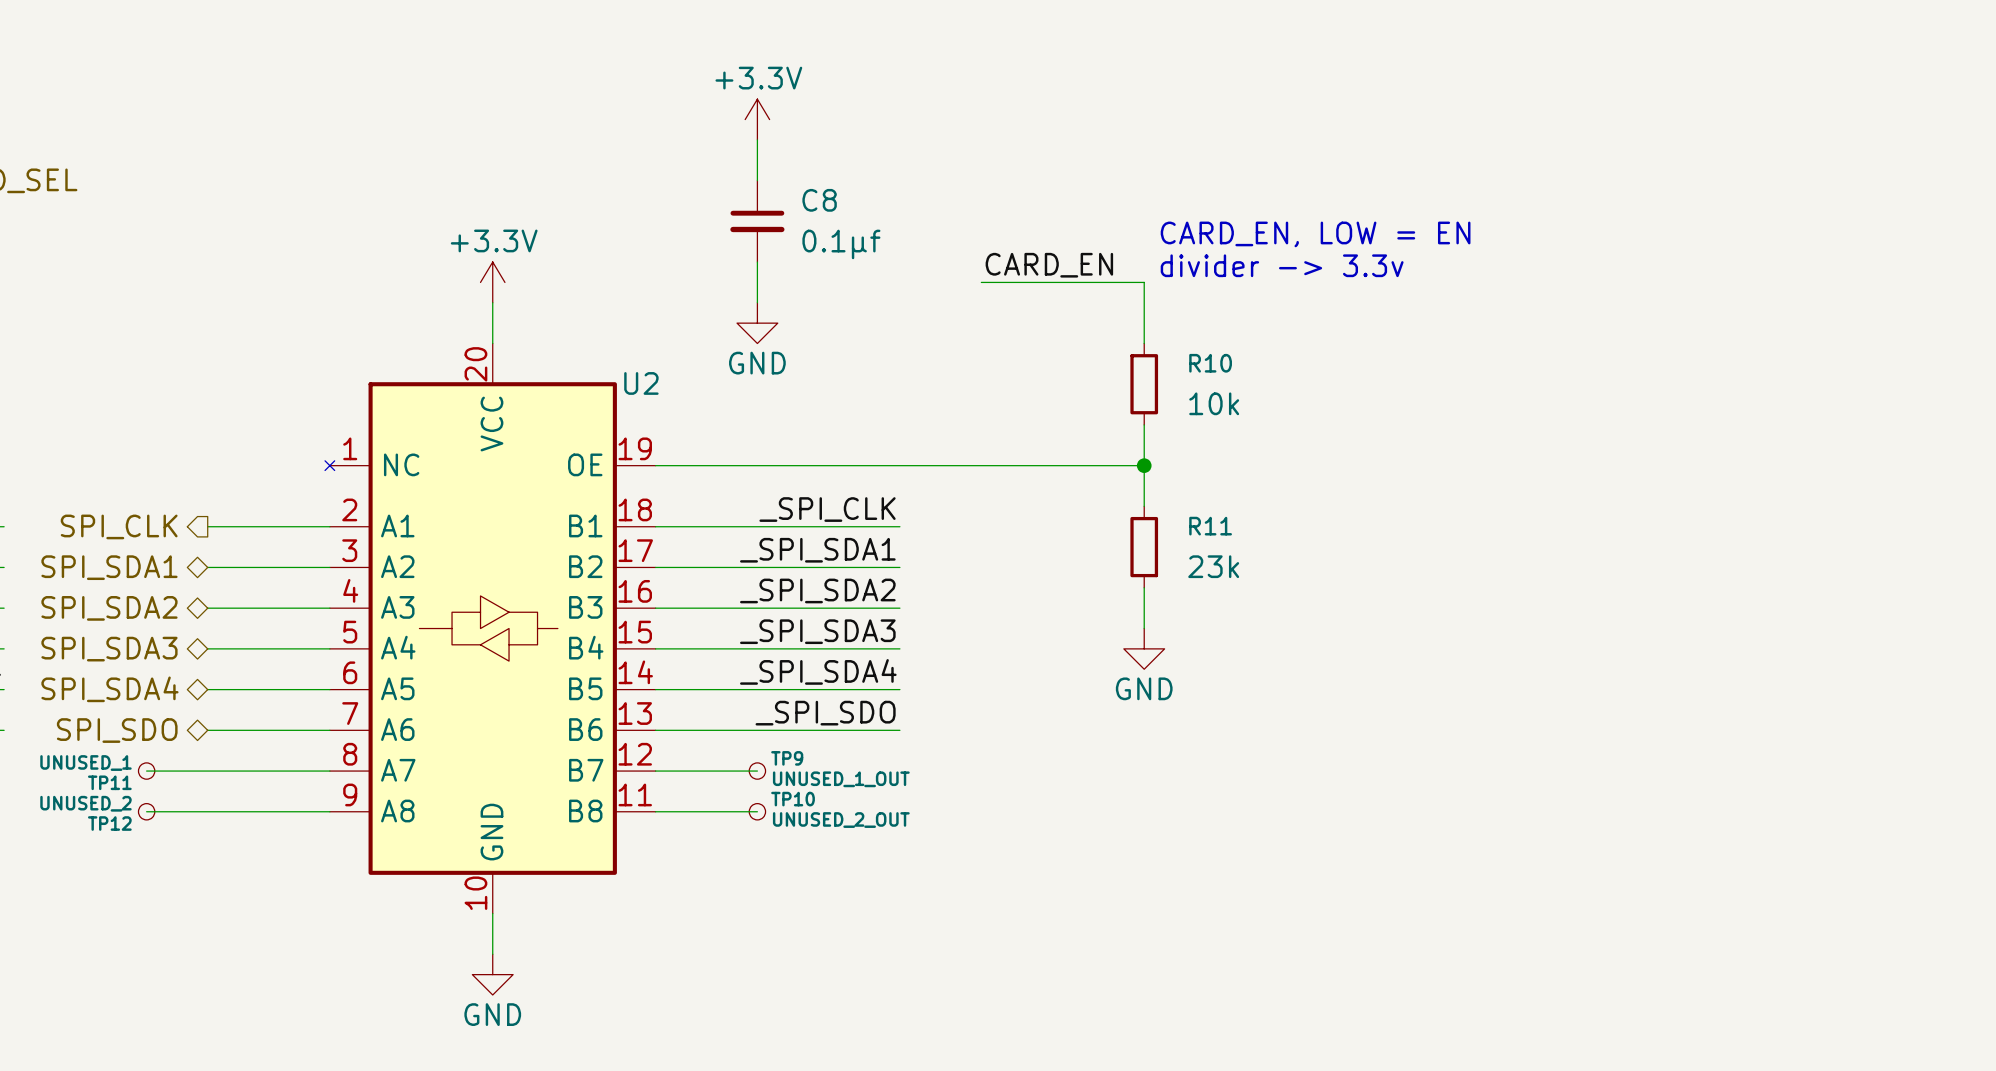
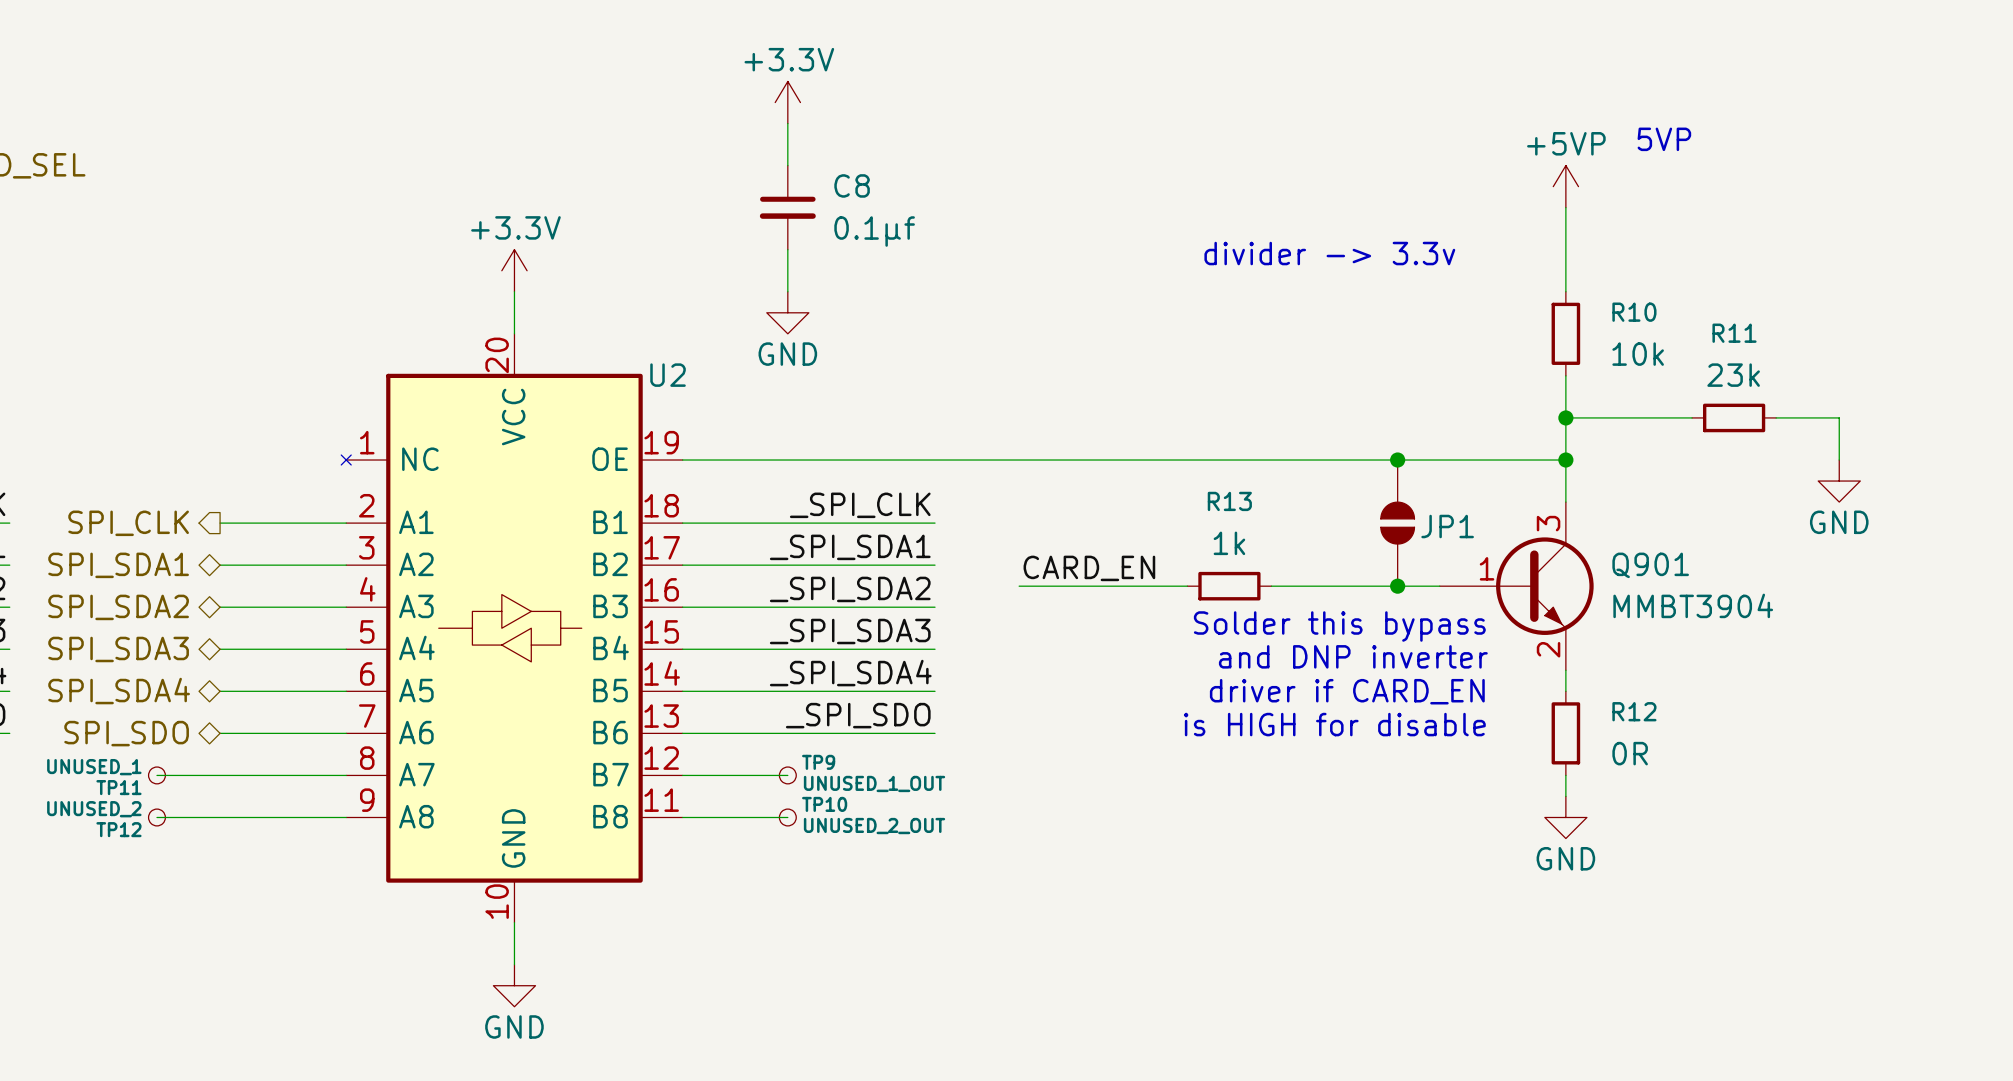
text: none -> 5VP (1664, 139)
power symbol: none -> +5VP (1565, 186)
wire: none -> (1565, 207) (1565, 291)
text: CARD_EN, LOW = EN (1315, 234) -> none
label position: CARD_EN (1049, 265) -> CARD_EN (1089, 568)
wire: (981, 282) (1144, 282) (1144, 343) -> none
R10 position: (1144, 384) -> (1565, 333)
wire: none -> (1565, 375) (1565, 502)
wire: (1144, 424) (1144, 506) -> none
wire: none -> (1565, 417) (1692, 417)
junction: none -> (1565, 417)
wire: none -> (1776, 417) (1839, 417) (1839, 460)
wire: none -> (1187, 460) (1565, 460)
junction: (1144, 465) -> none
junction: none -> (1397, 460)
junction: none -> (1565, 460)
power symbol: none -> GND (1839, 481)
R11 name position: R11 (1210, 526) -> R11 (1734, 333)
JP1: none -> (1397, 523)
R11 rotation: 0° (1144, 547) -> 90° clockwise (1734, 417)
R11 position: (1144, 547) -> (1734, 417)
R11 value position: 23k (1213, 566) -> 23k (1733, 375)
wire: (1144, 587) (1144, 628) -> (1187, 586) (1019, 586)
R13: none -> 1k (1229, 586)
wire: none -> (1271, 586) (1439, 586)
junction: none -> (1397, 586)
Q901: none -> MMBT3904 (1516, 586)
text: none -> Solder this bypass (1339, 626)
power symbol: GND (1144, 648) -> none
text: none -> and DNP inverter (1353, 656)
wire: none -> (1565, 670) (1565, 691)
text: none -> driver if CARD_EN (1347, 691)
text: none -> is HIGH for disable (1334, 724)
R12: none -> 0R (1565, 733)
wire: none -> (1565, 775) (1565, 796)
power symbol: none -> GND (1565, 817)

